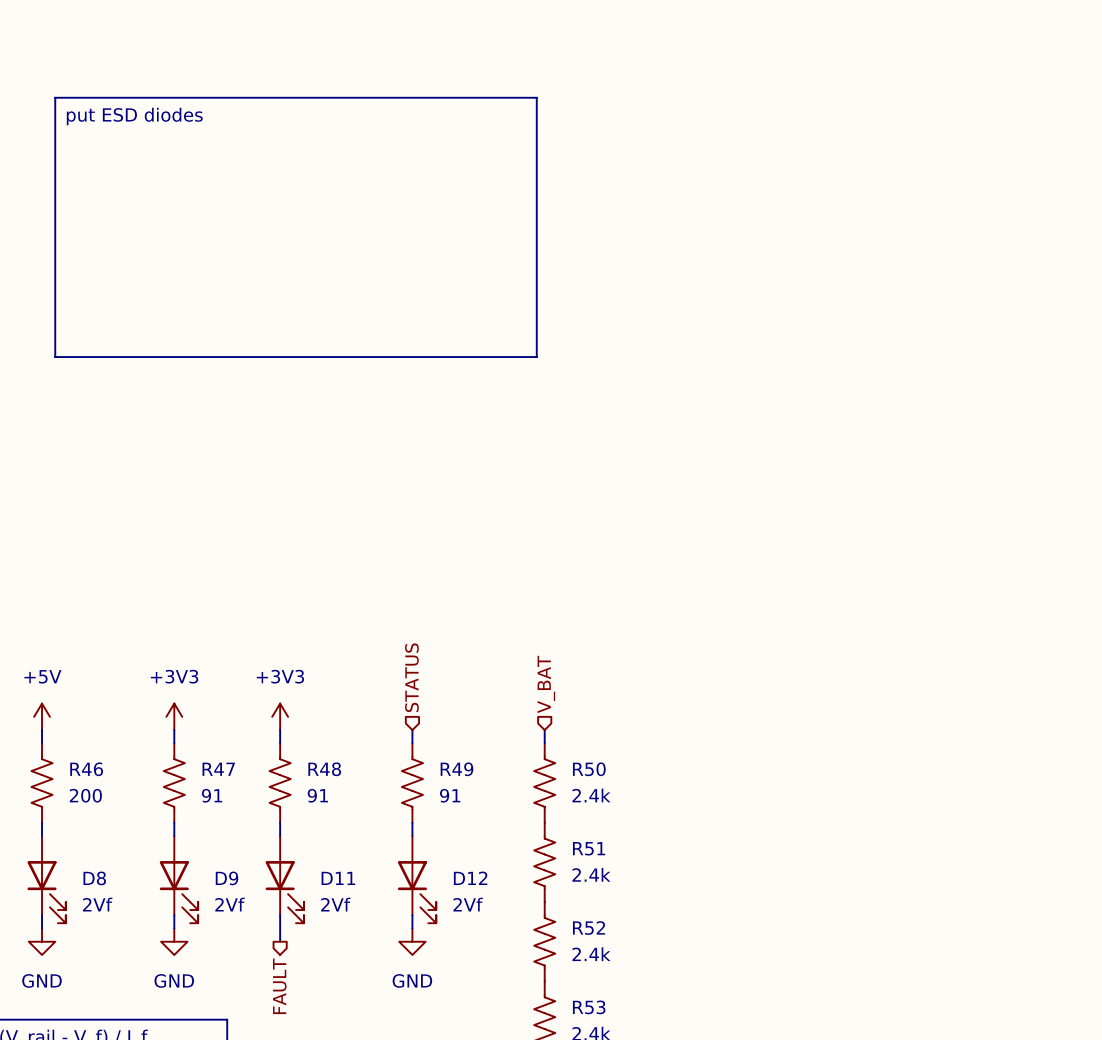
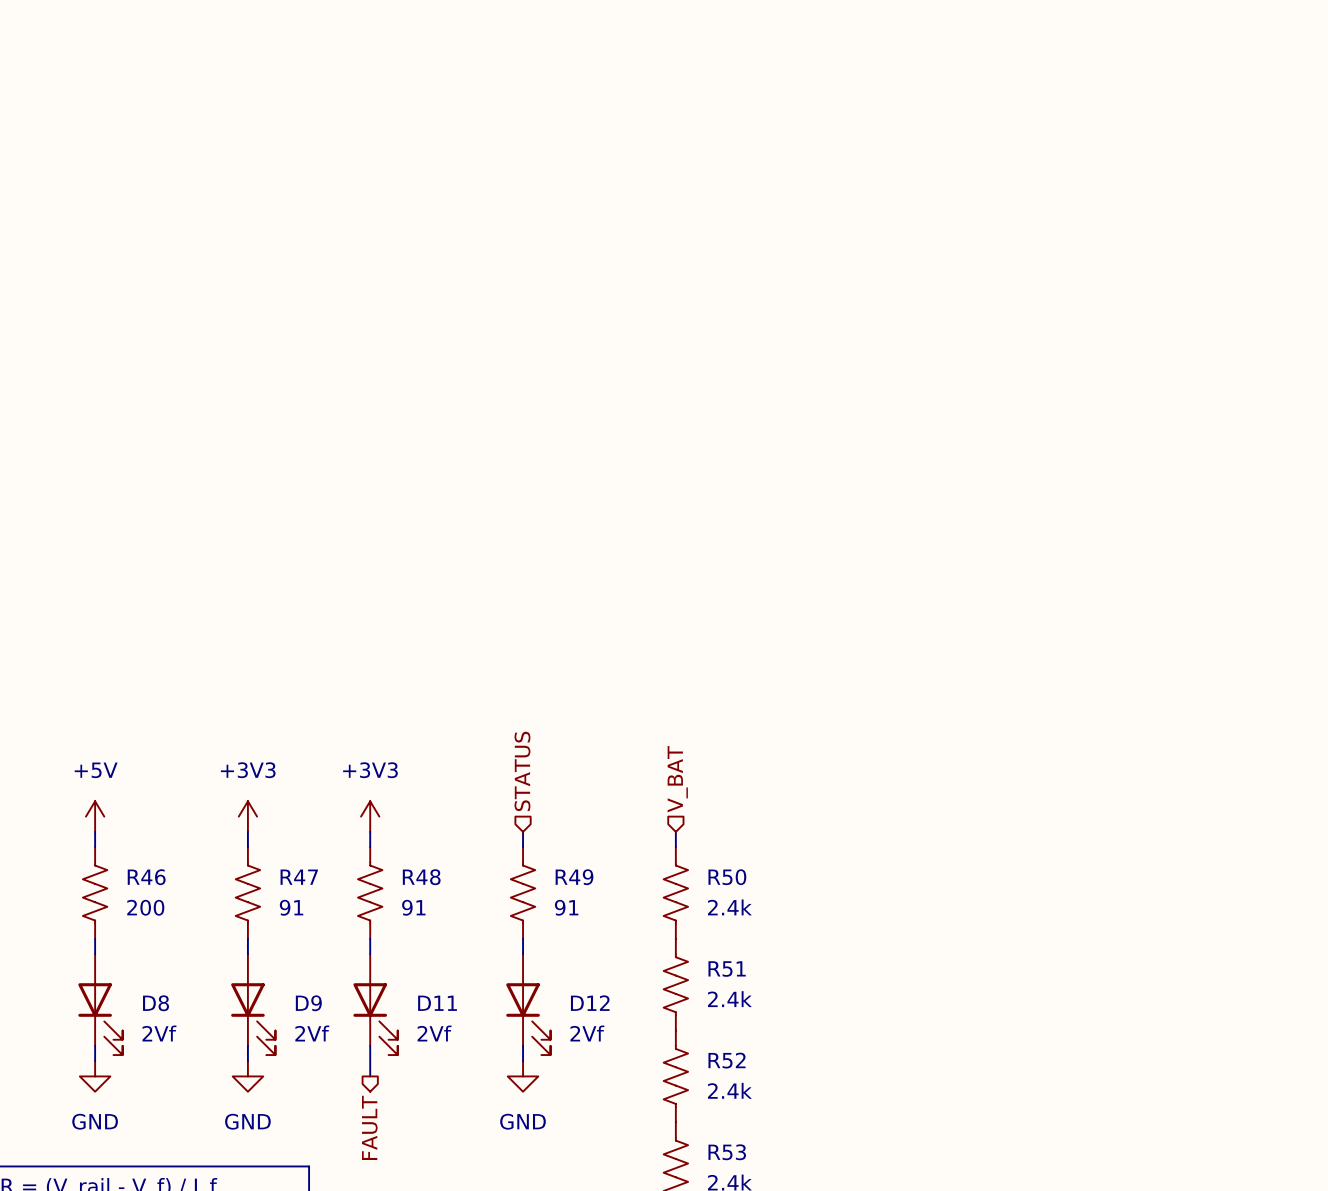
line: (55, 97) (536, 97) (536, 357) (55, 357) (55, 97) -> none
text: put ESD diodes (134, 116) -> none

